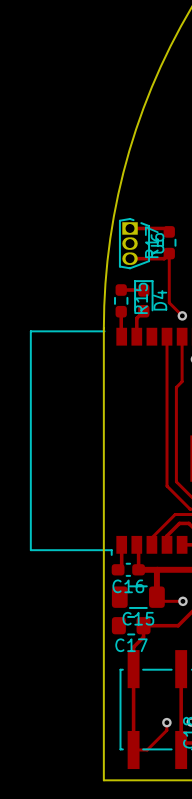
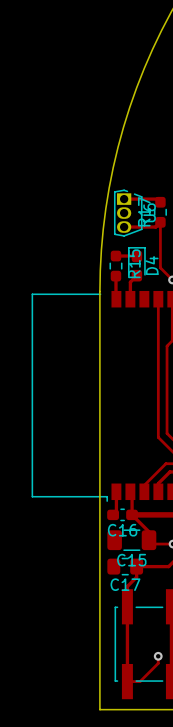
track: none -> (132, 514) (149, 531)
track: (157, 569) (156, 597) -> none

